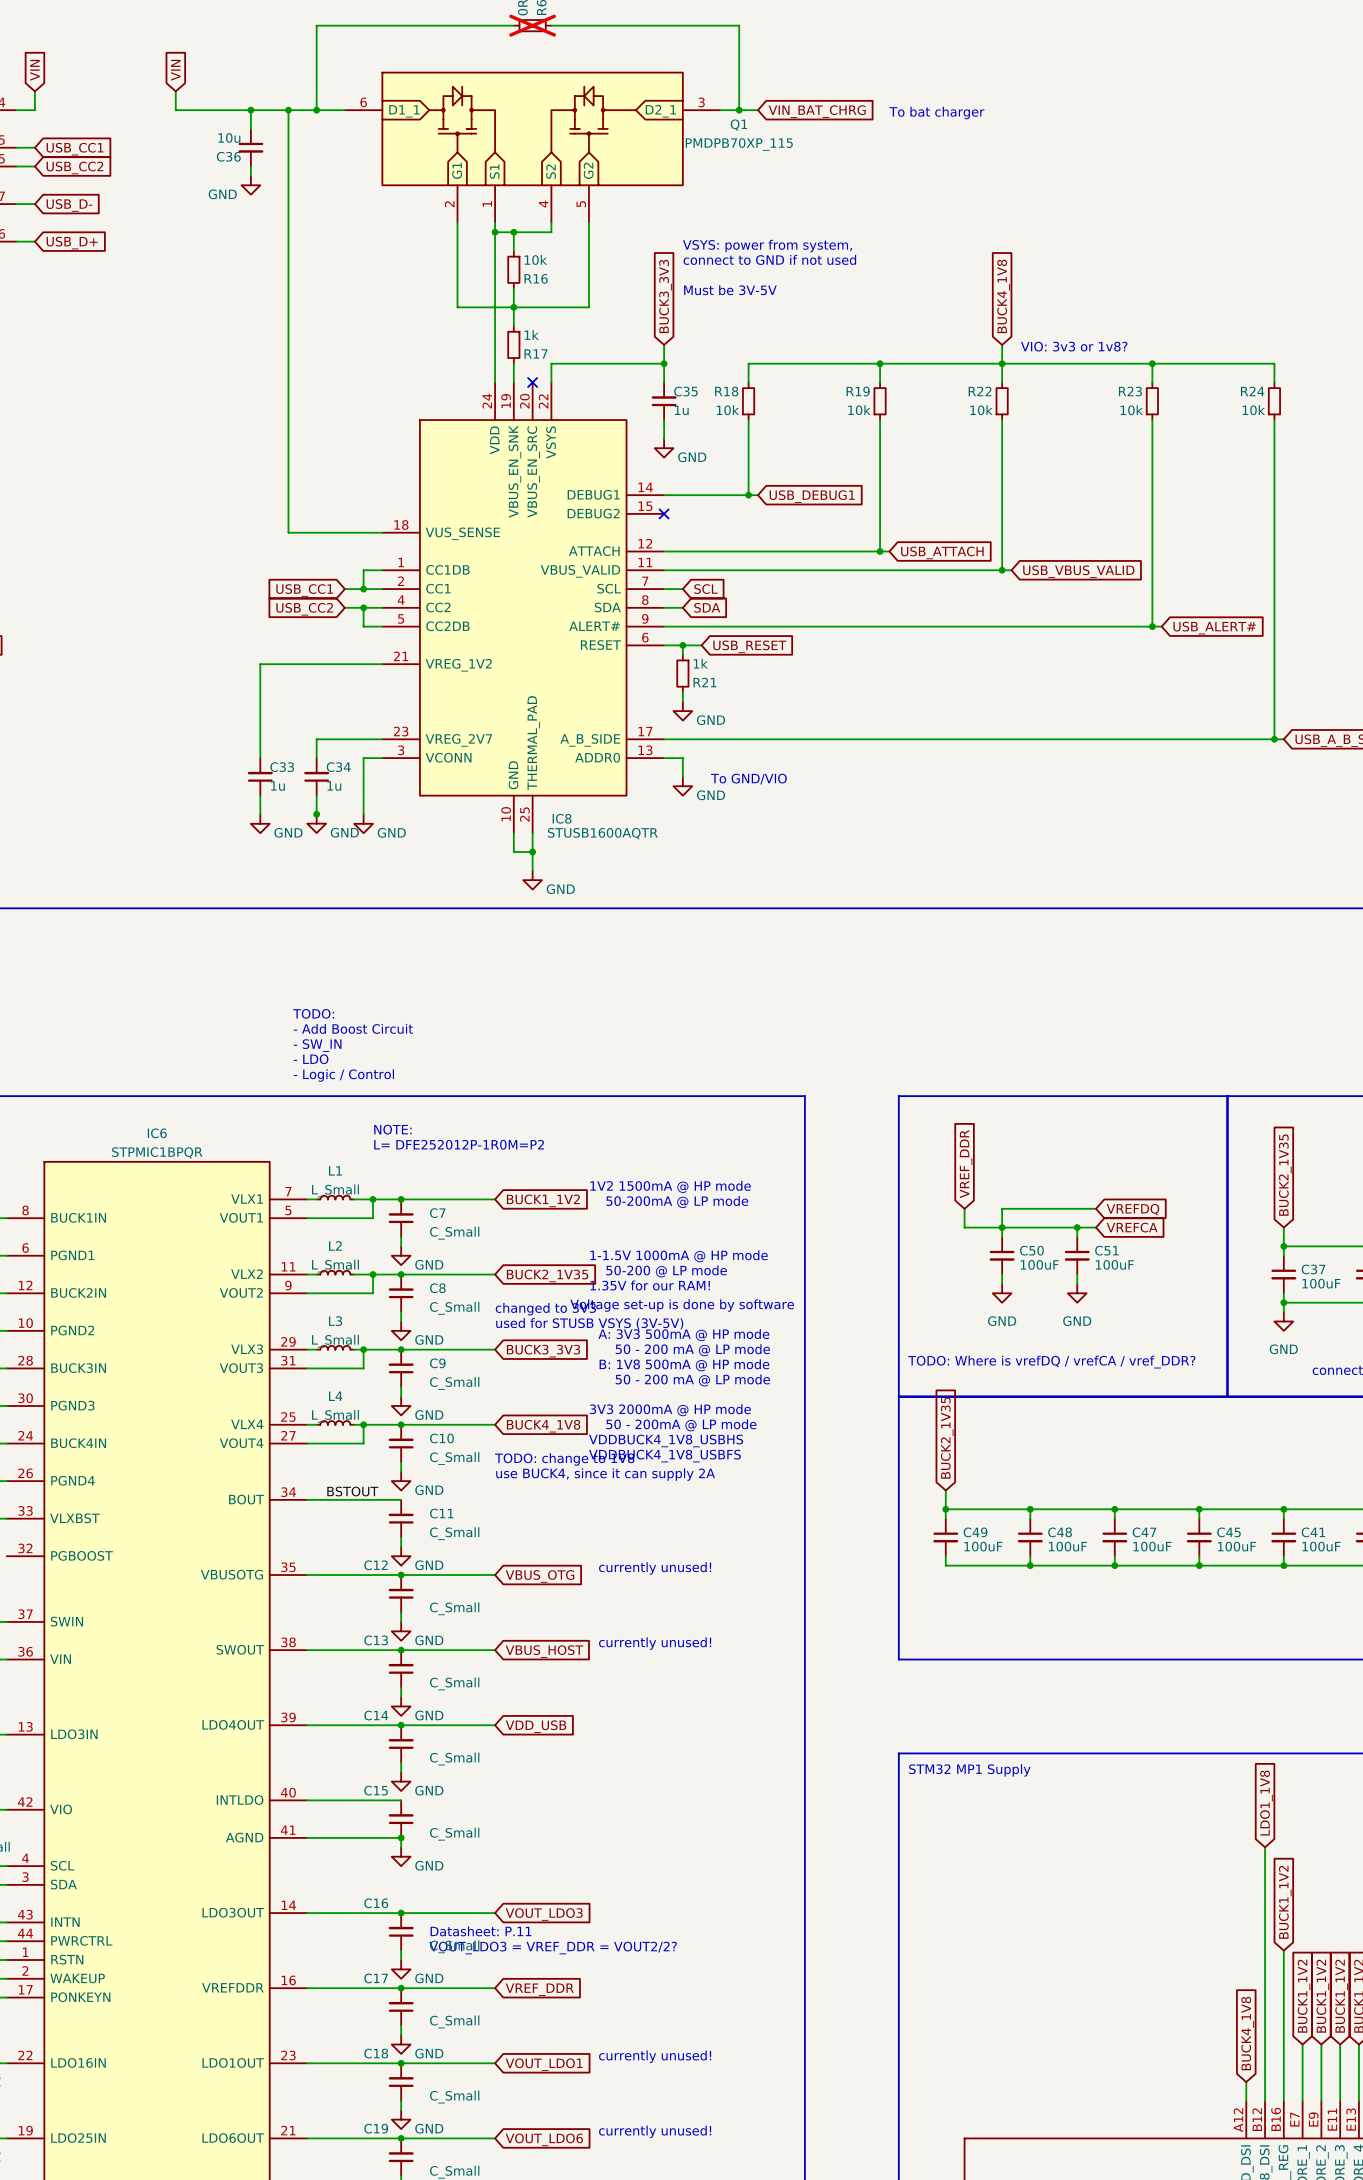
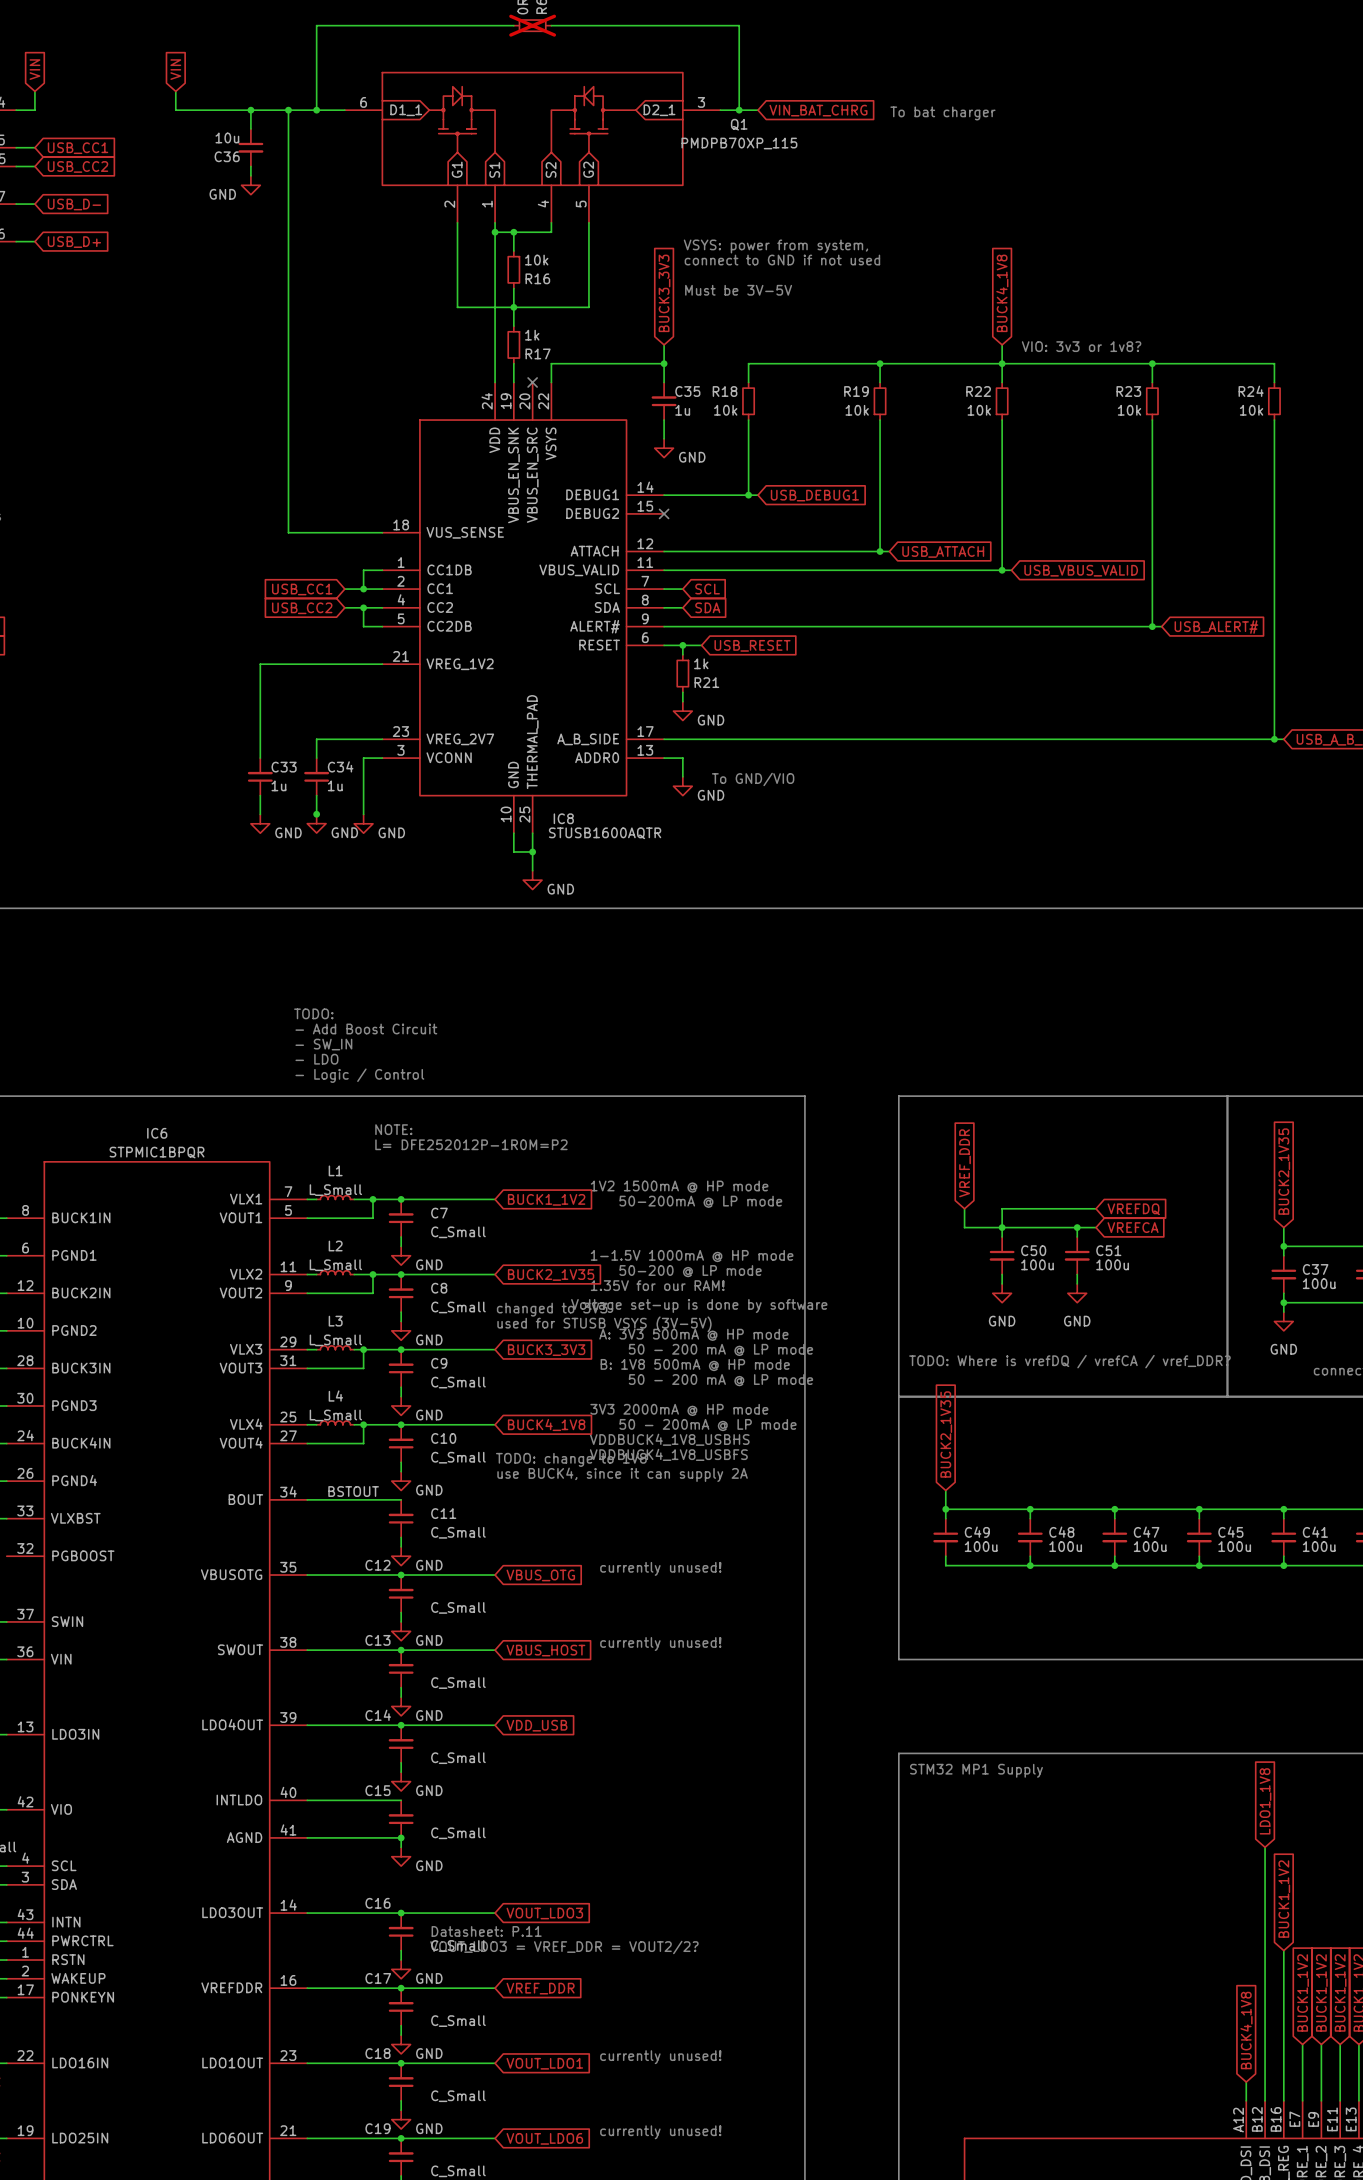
C50 value: 100uF (1039, 1264) -> 100u (1037, 1264)
C51 value: 100uF (1114, 1264) -> 100u (1112, 1264)
C37 value: 100uF (1321, 1283) -> 100u (1319, 1283)
C49 value: 100uF (983, 1546) -> 100u (981, 1546)
C48 value: 100uF (1067, 1546) -> 100u (1065, 1546)
C47 value: 100uF (1152, 1546) -> 100u (1150, 1546)
C45 value: 100uF (1236, 1546) -> 100u (1234, 1546)
C41 value: 100uF (1321, 1546) -> 100u (1319, 1546)

